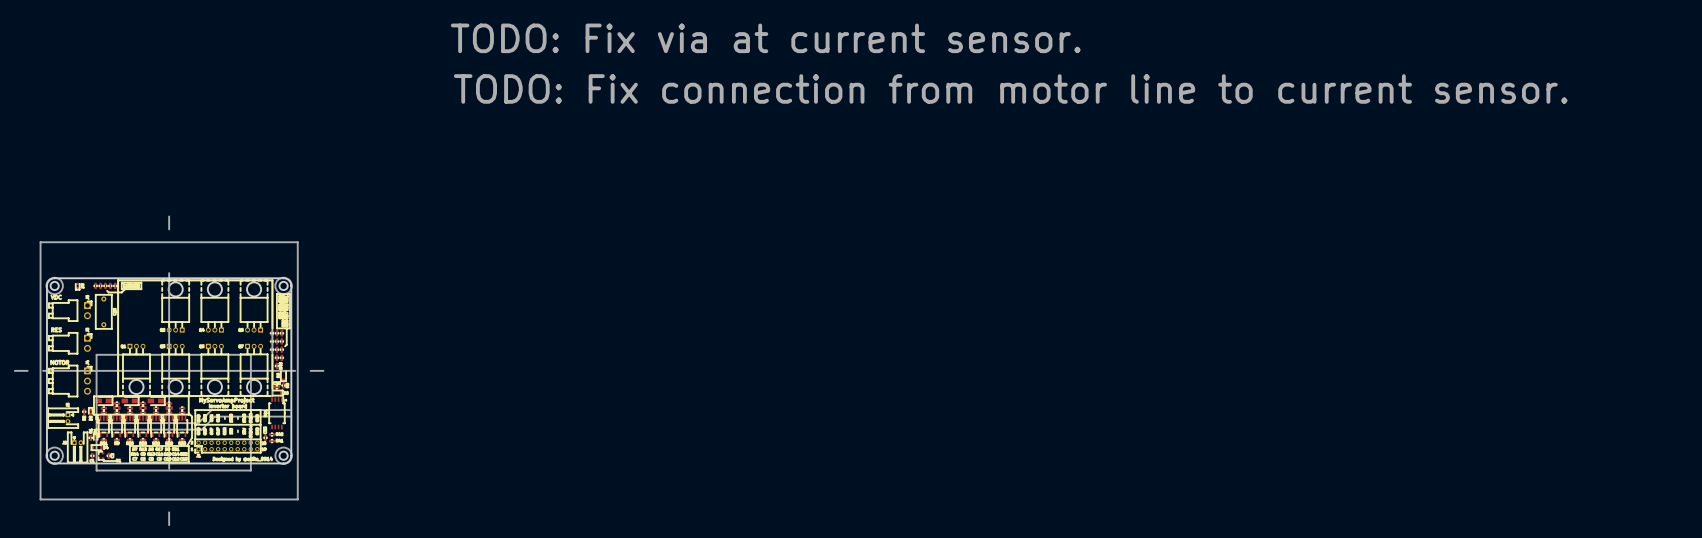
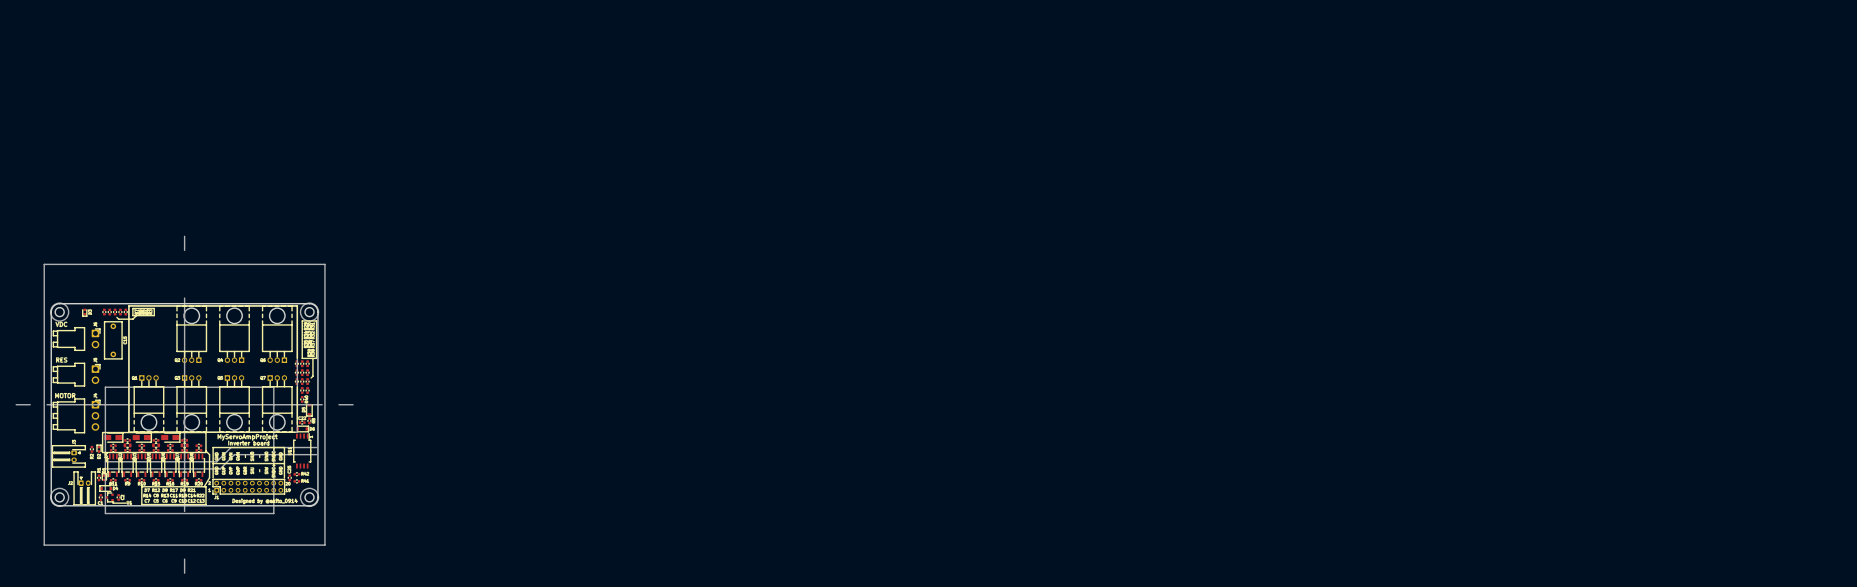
text: TODO: Fix via at current sensor. (765, 38) -> none
text: TODO: Fix connection from motor line to current sensor. (1010, 88) -> none

